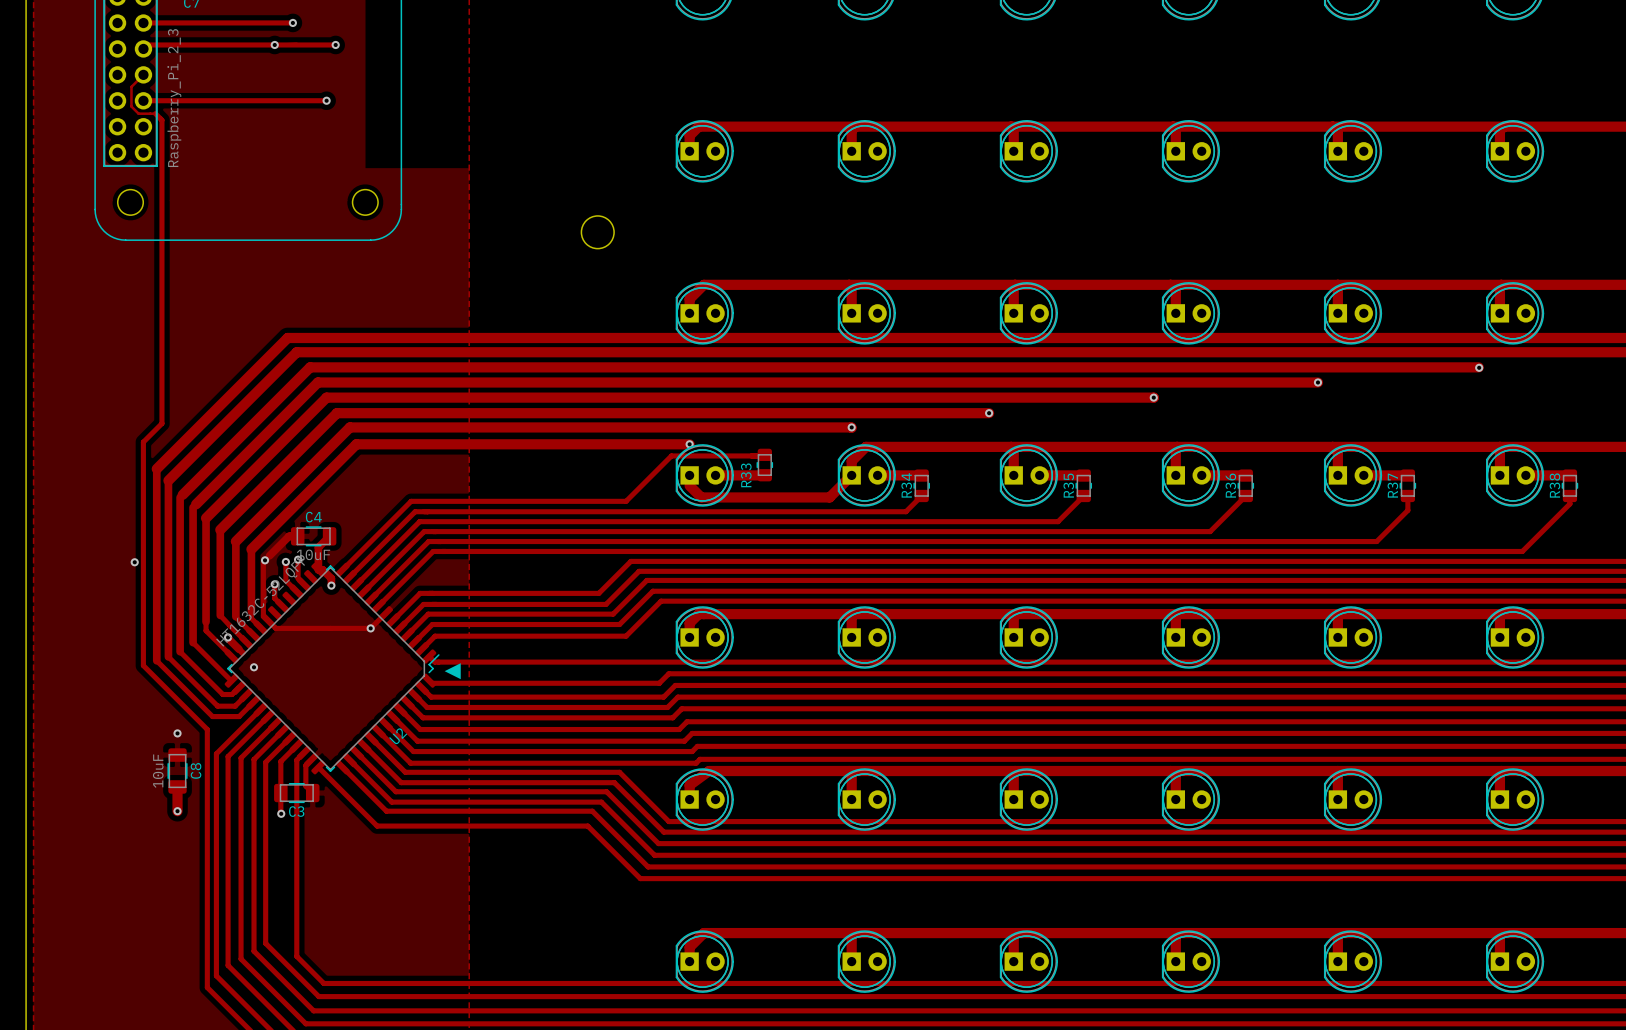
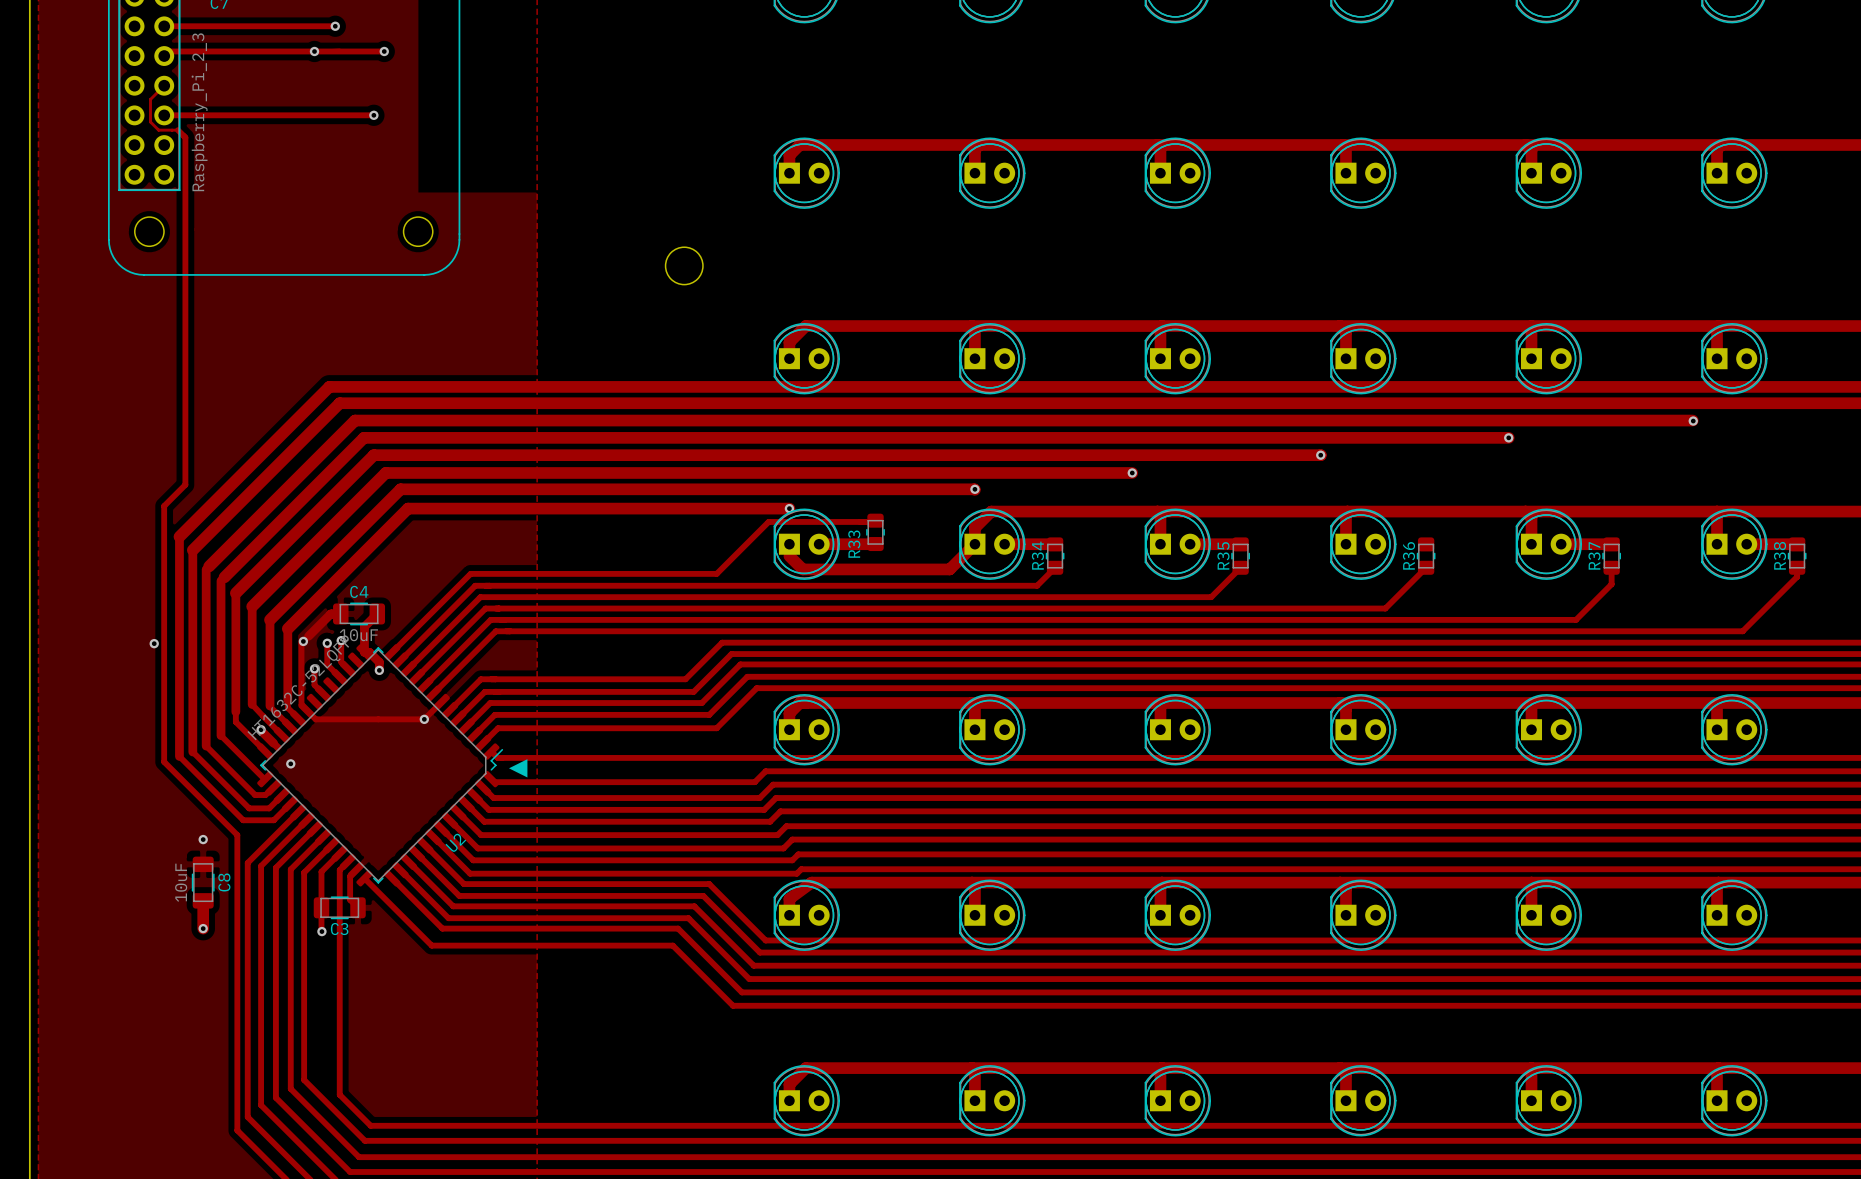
track: (1201, 475) (1245, 475) -> none

